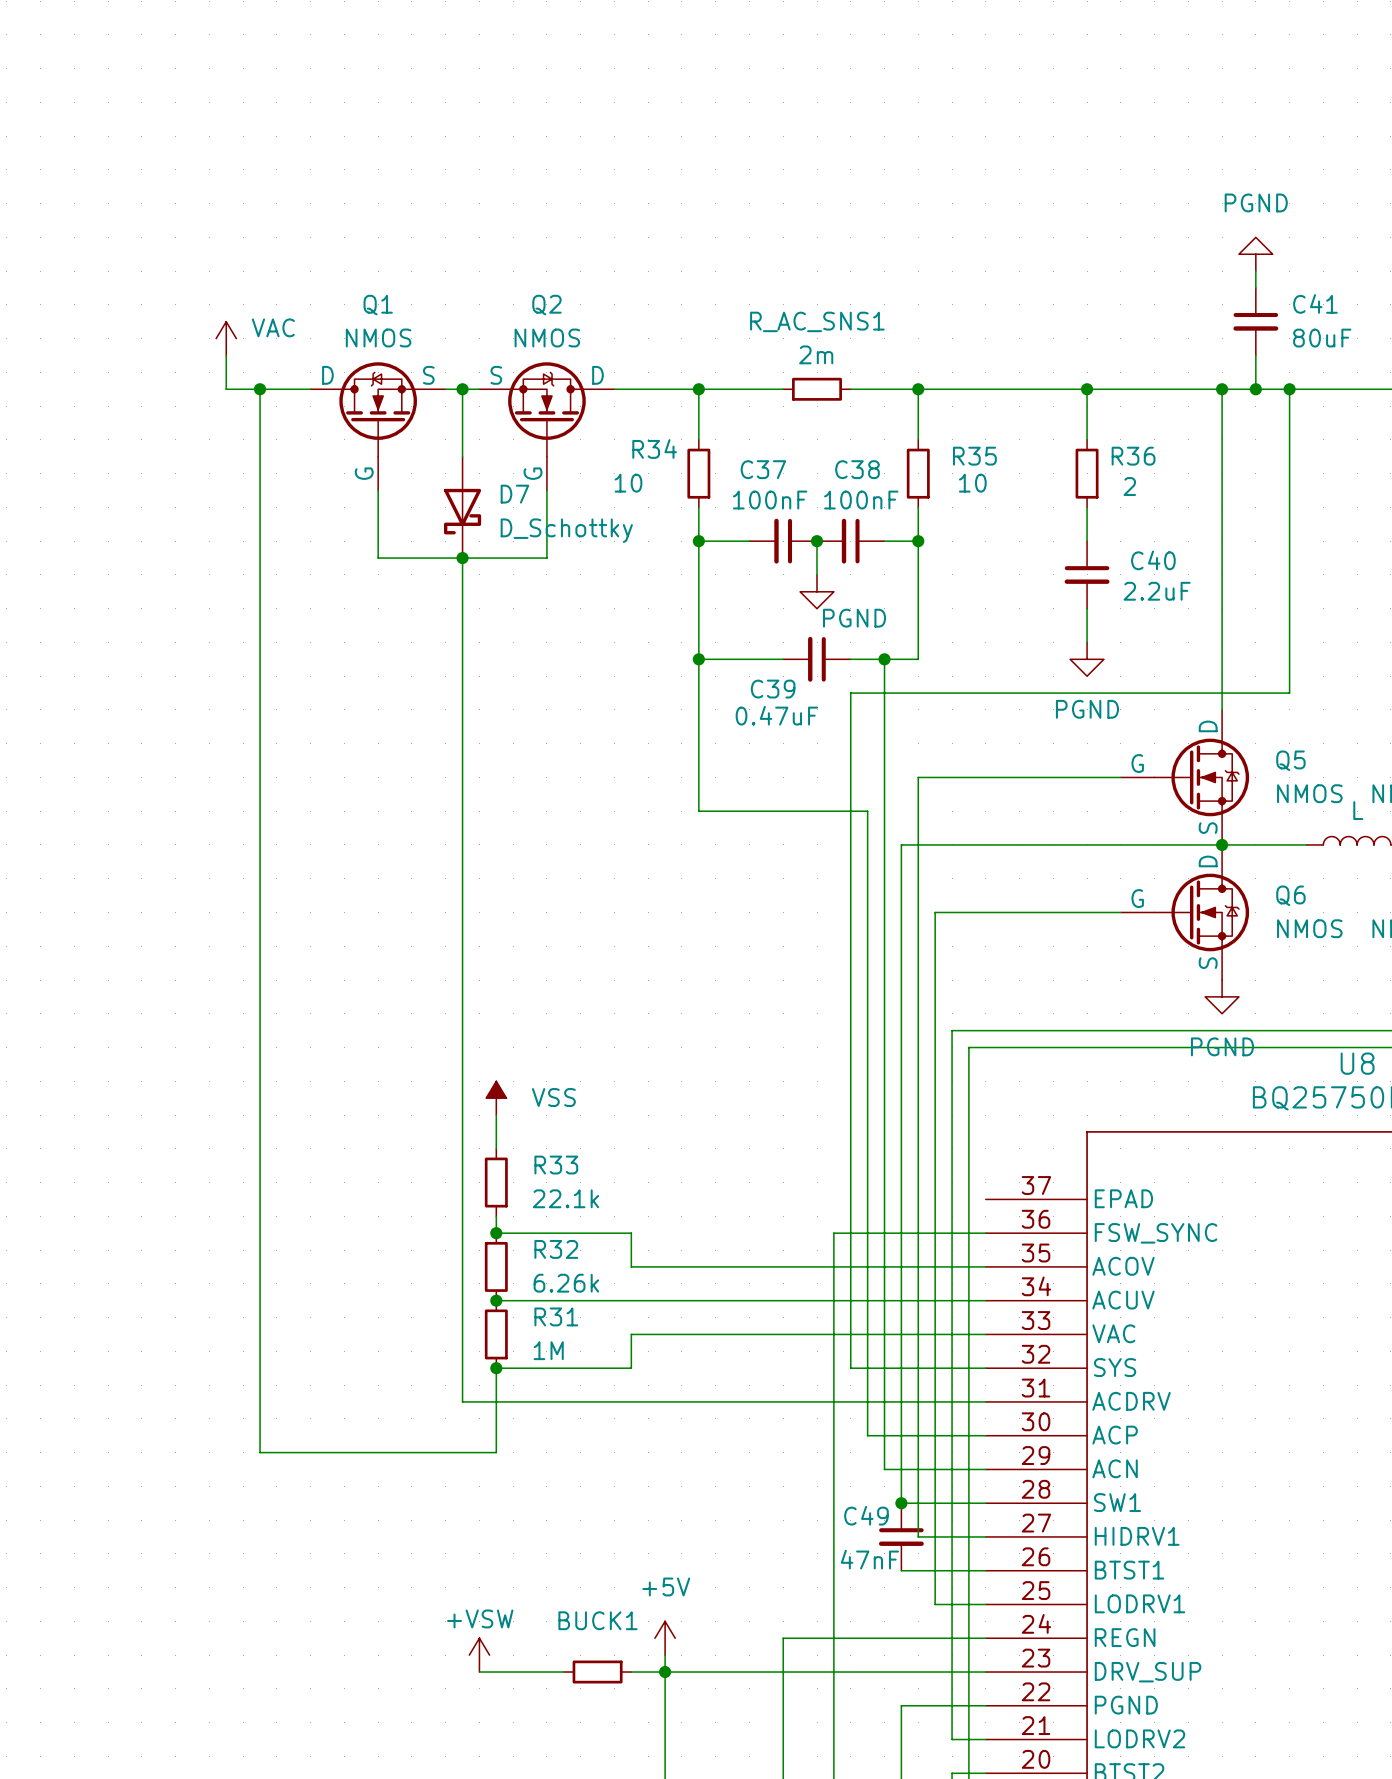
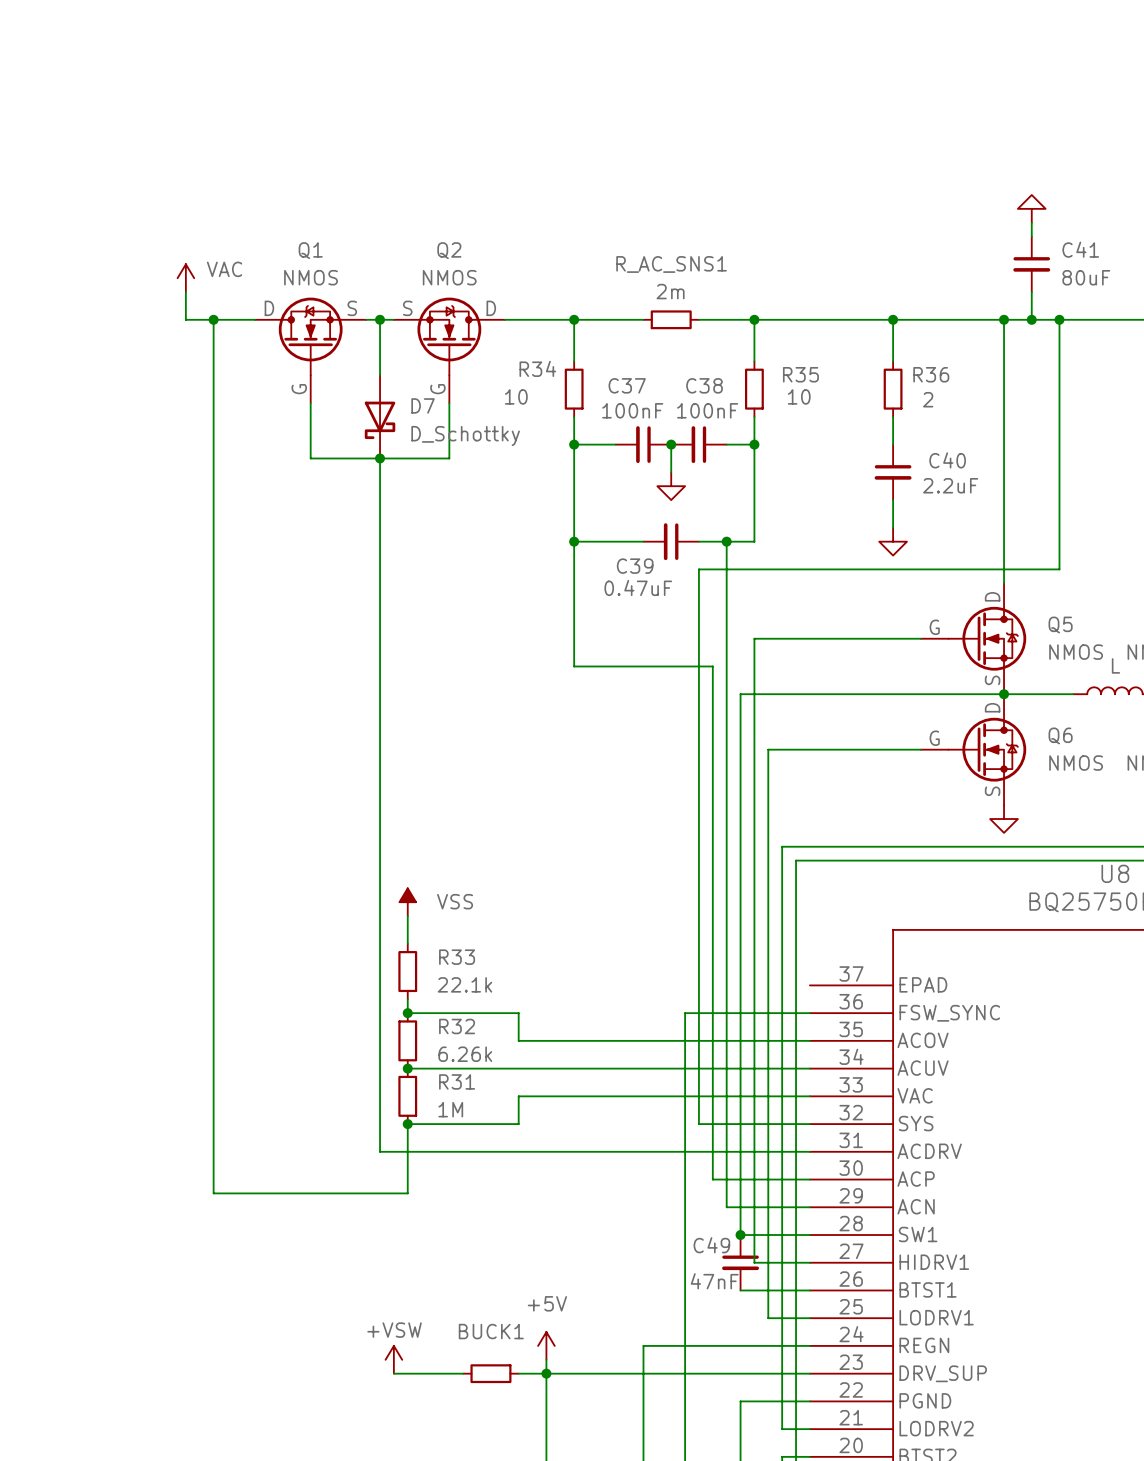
power symbol text: PGND (1256, 202) -> none
power symbol text: PGND (854, 618) -> none
power symbol text: PGND (1087, 709) -> none
power symbol text: PGND (1222, 1046) -> none

